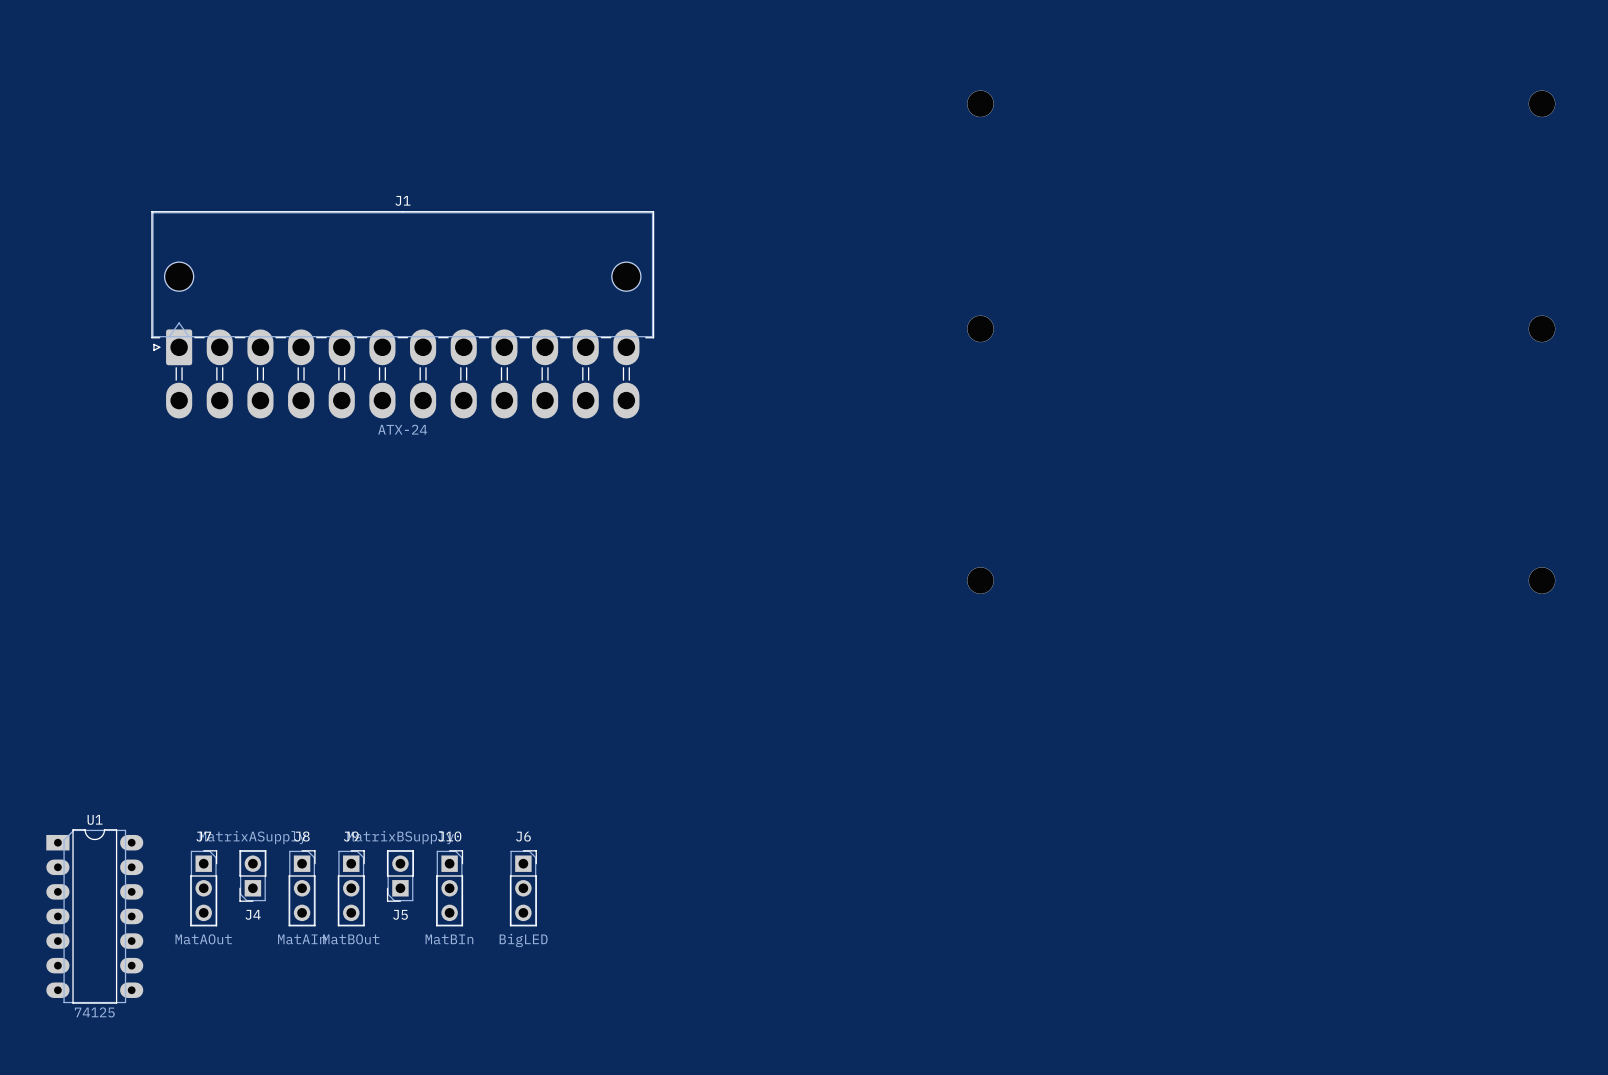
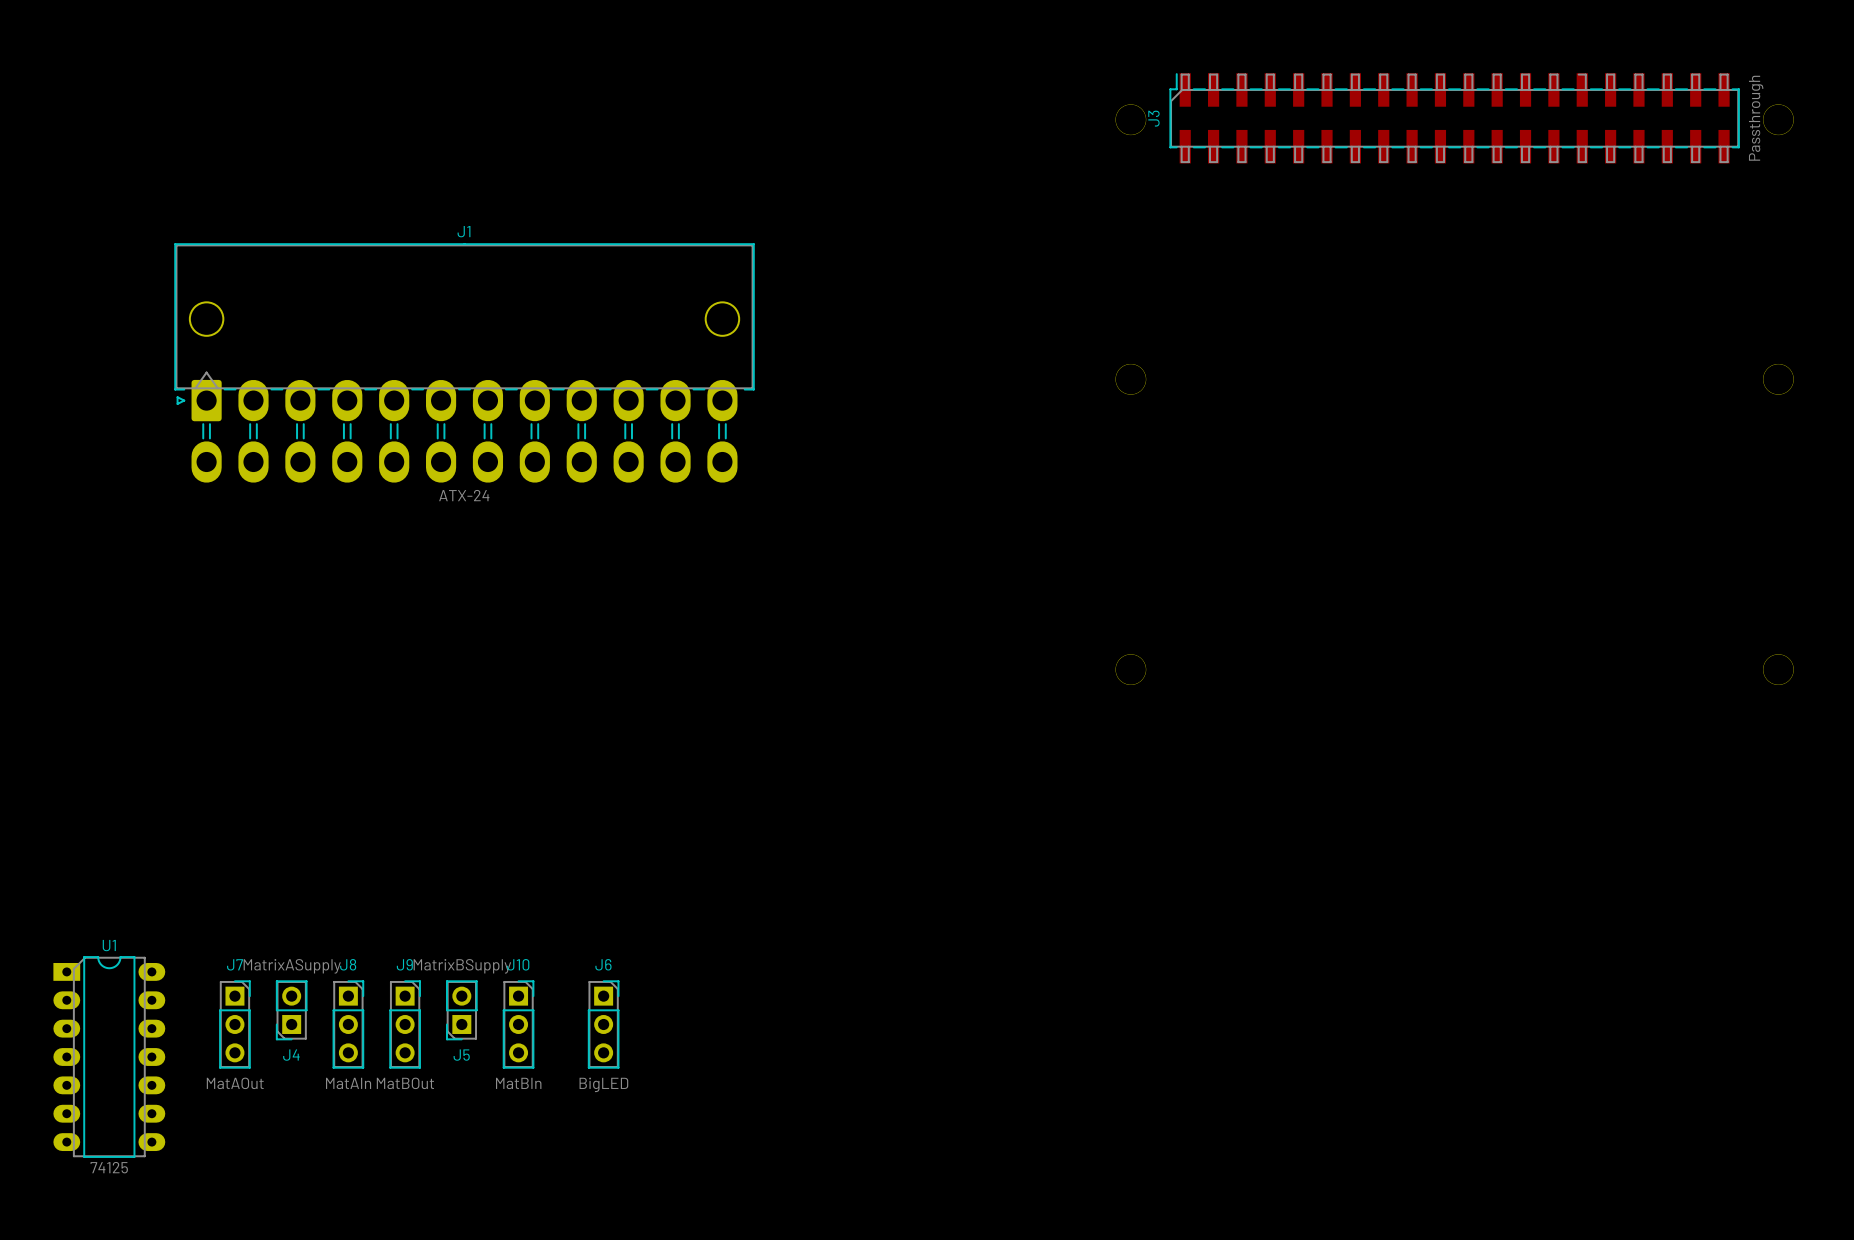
J3: none -> Passthrough (1454, 118)

